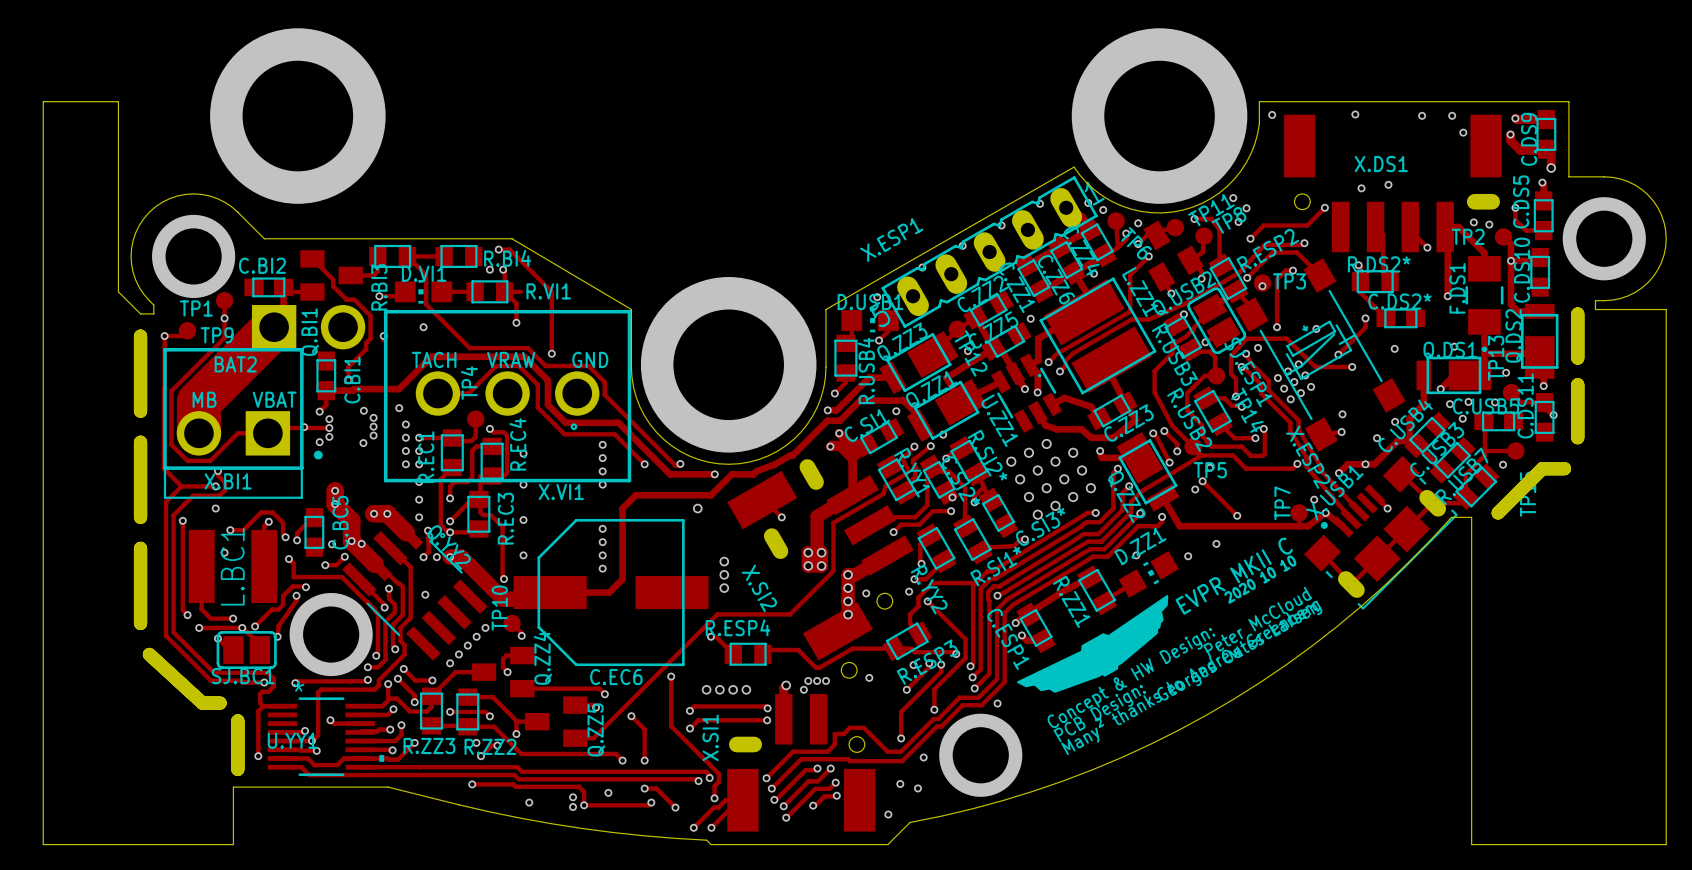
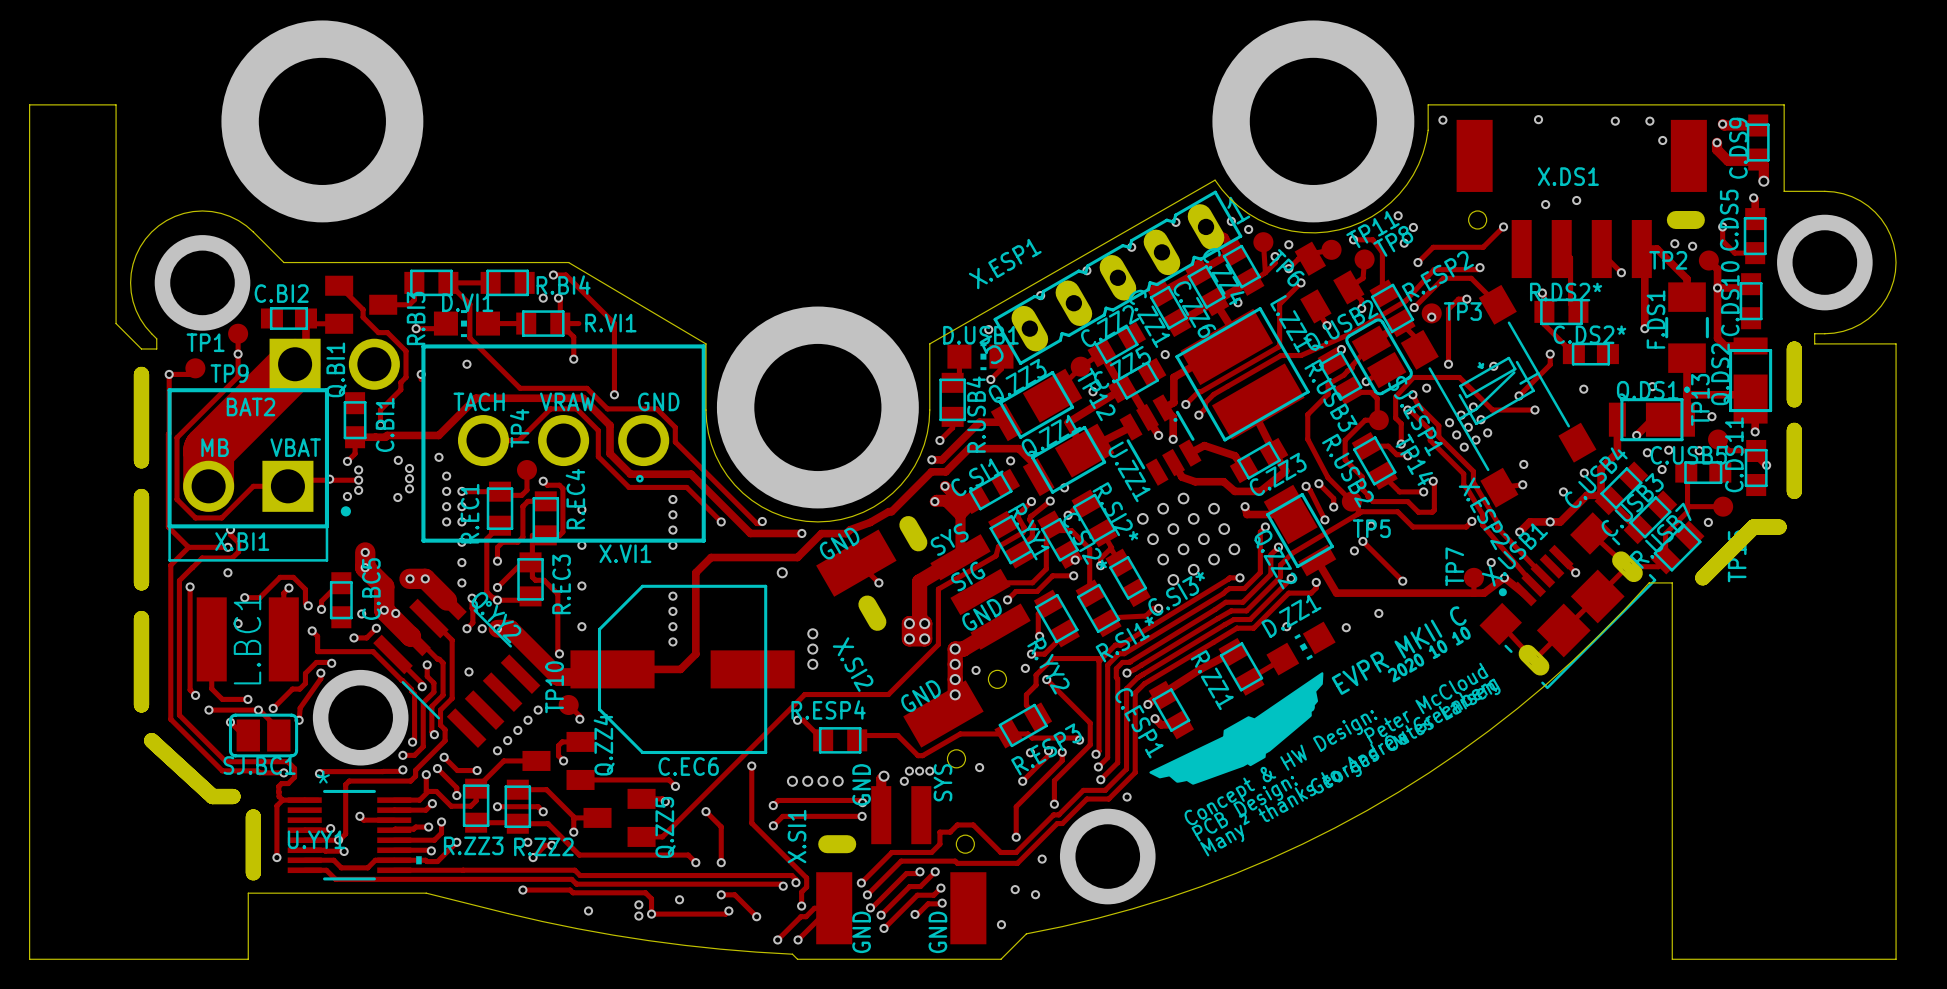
text: none -> SYS (949, 539)
text: none -> GND (839, 543)
text: none -> SIG (968, 576)
text: none -> GND (982, 614)
text: none -> GND (920, 696)
text: none -> SYS (942, 782)
text: none -> GND (861, 784)
text: none -> GND (861, 932)
text: none -> GND (937, 932)

